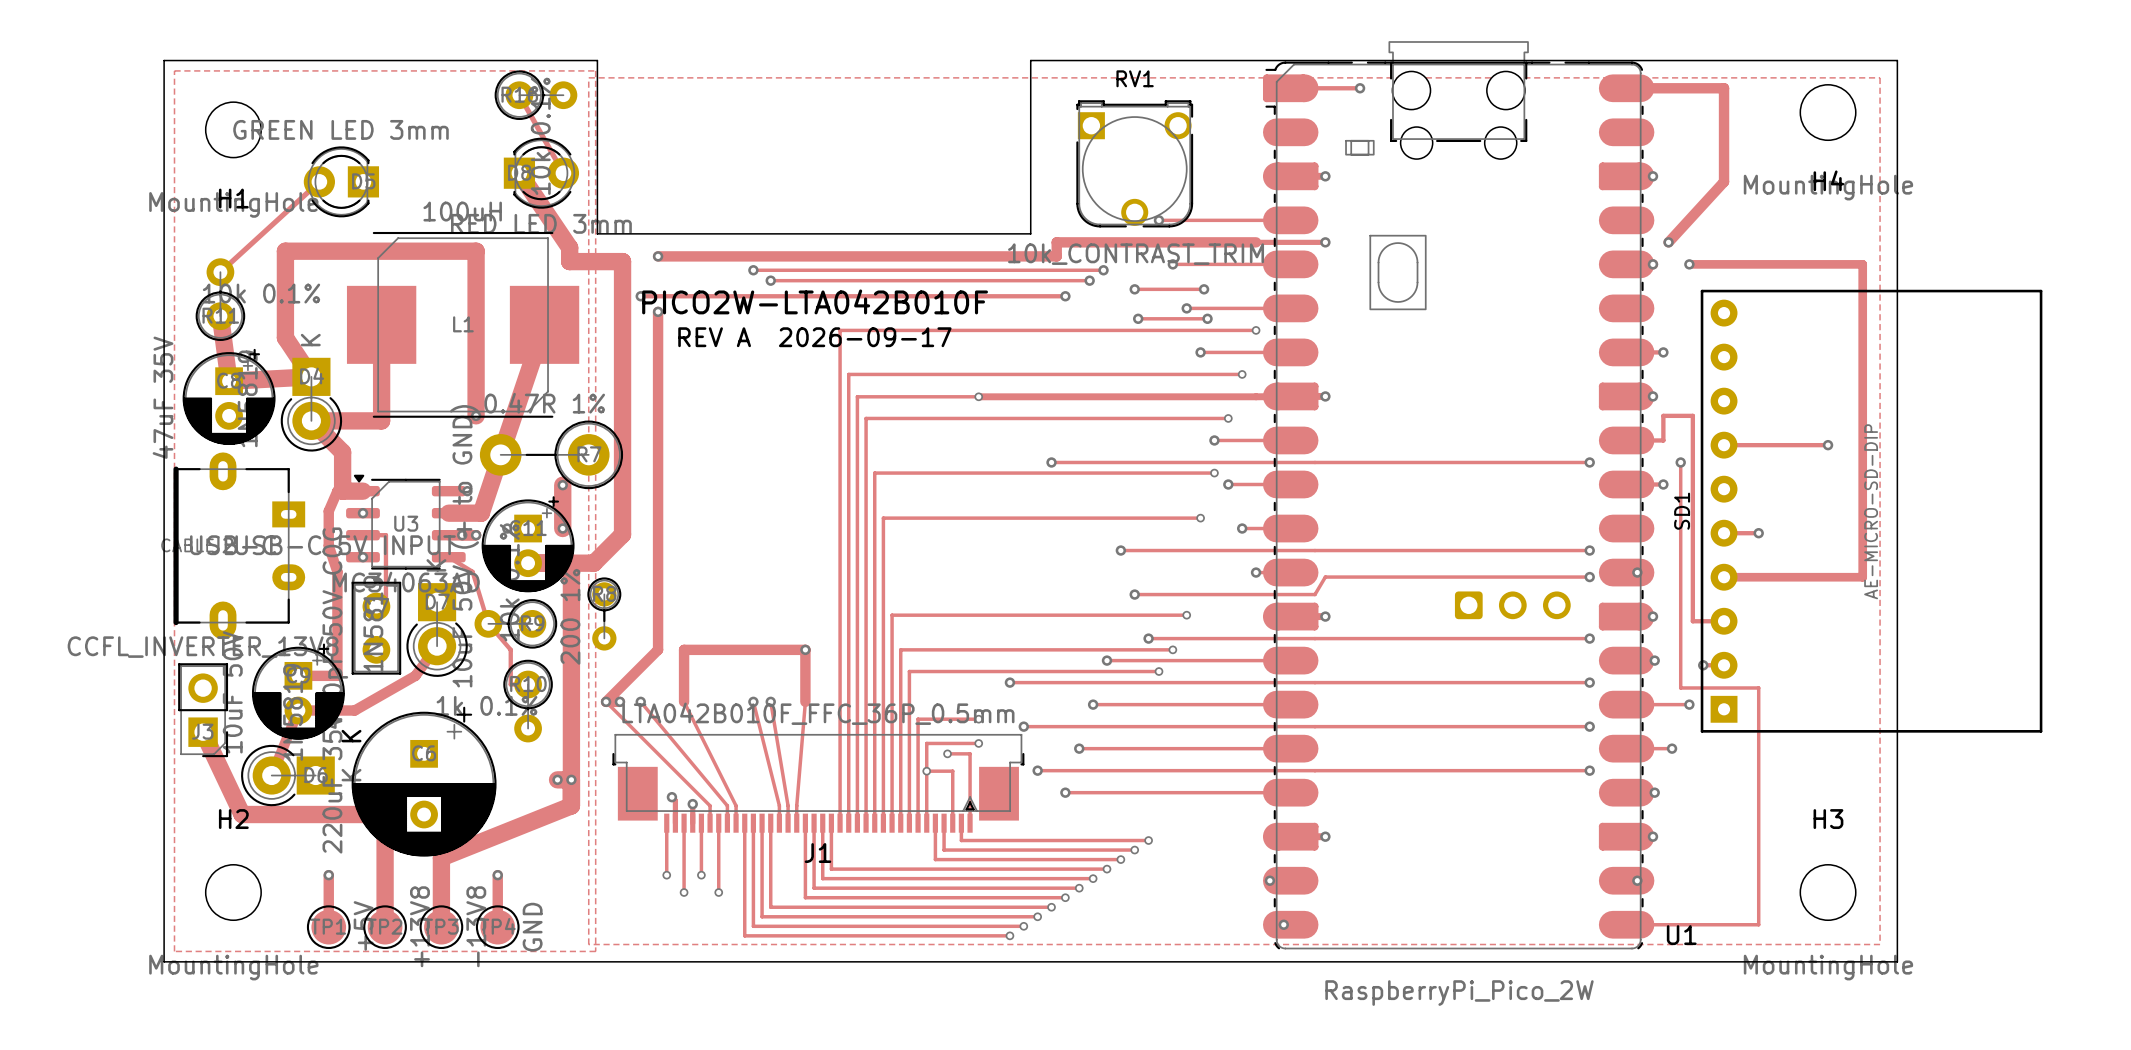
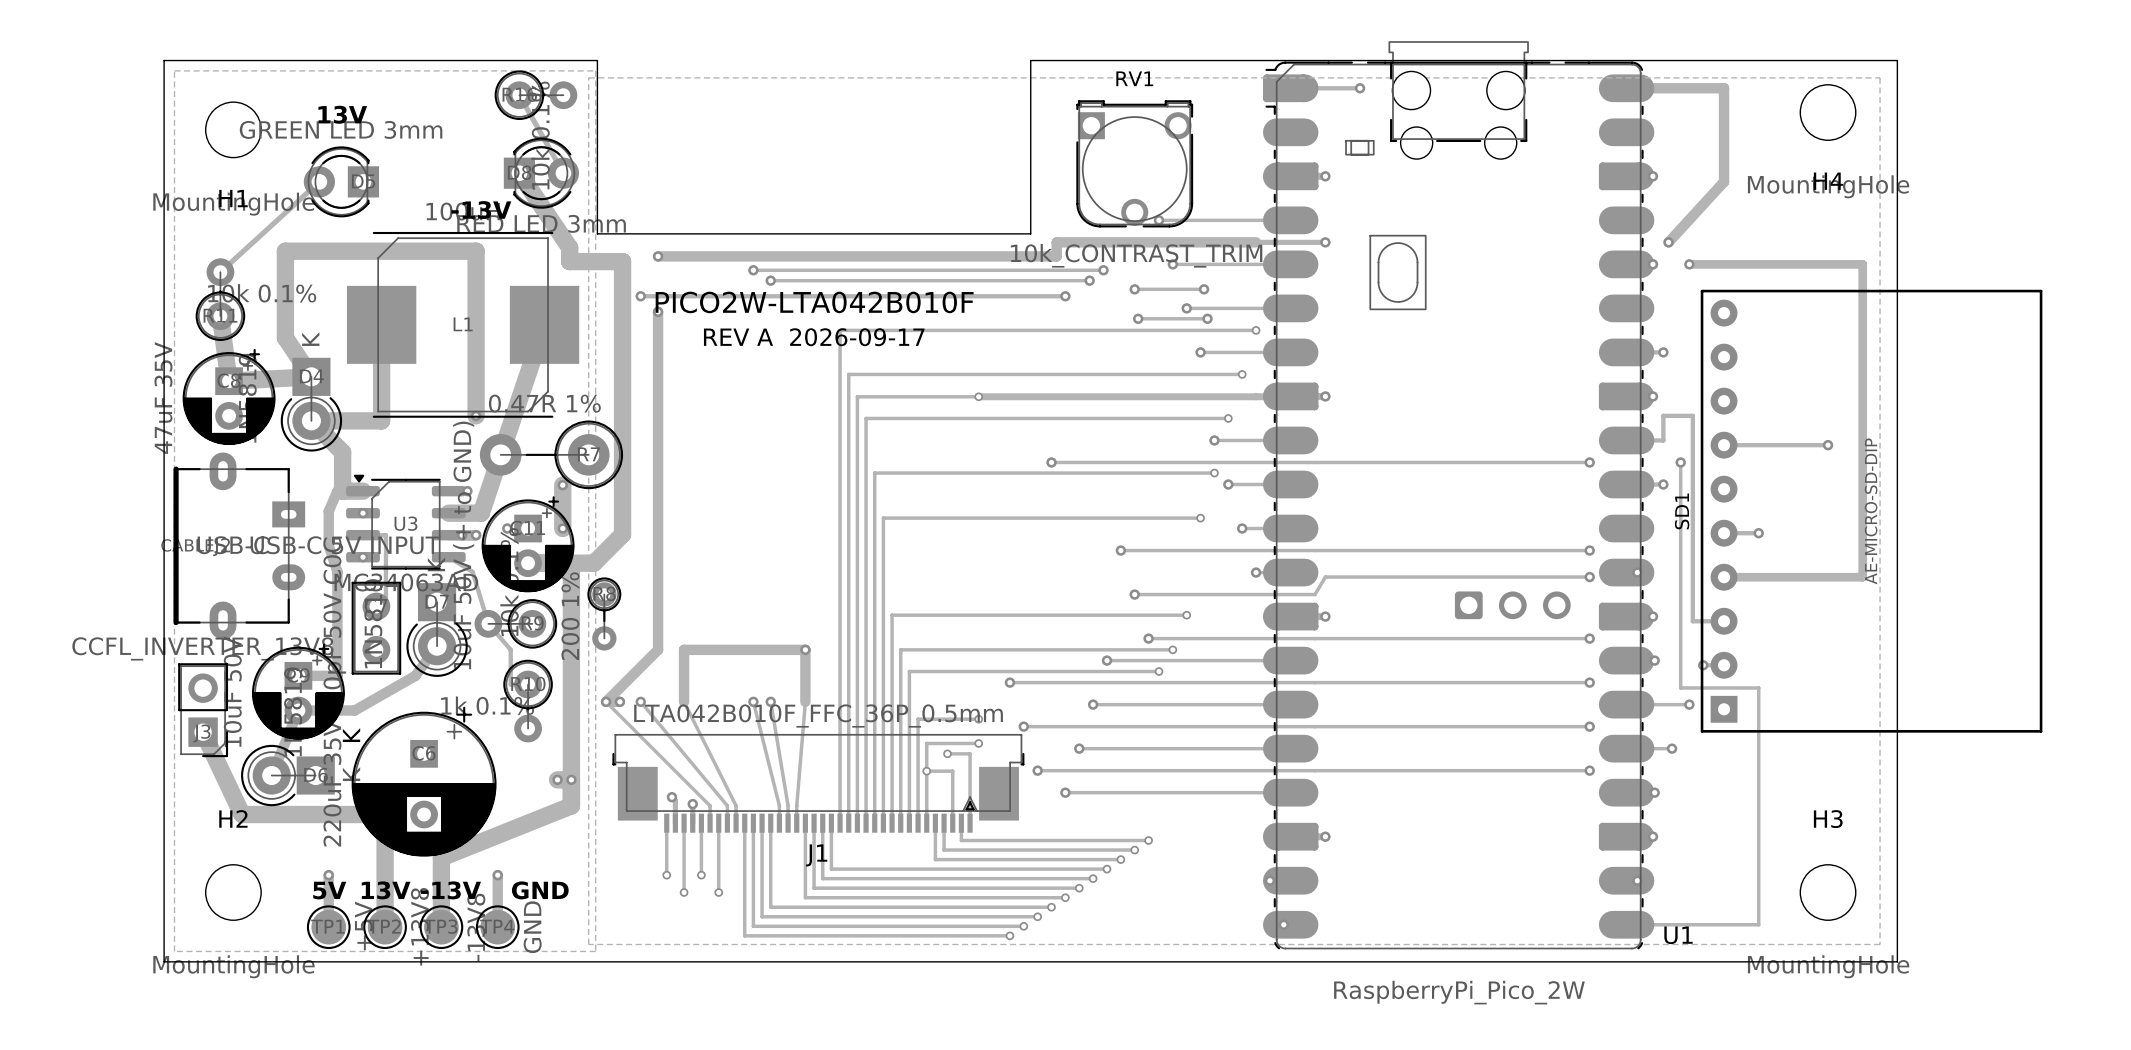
text: none -> 13V (342, 114)
text: none -> -13V (481, 210)
text: none -> 5V (329, 890)
text: none -> 13V (386, 890)
text: none -> -13V (451, 890)
text: none -> GND (540, 890)

